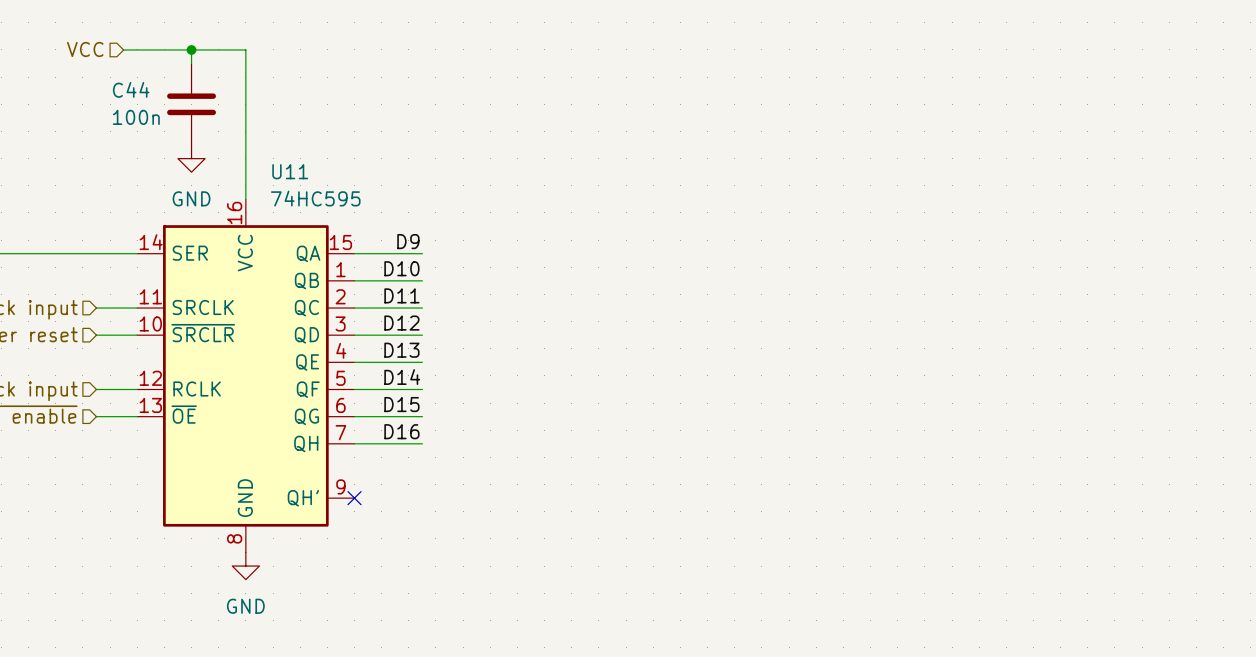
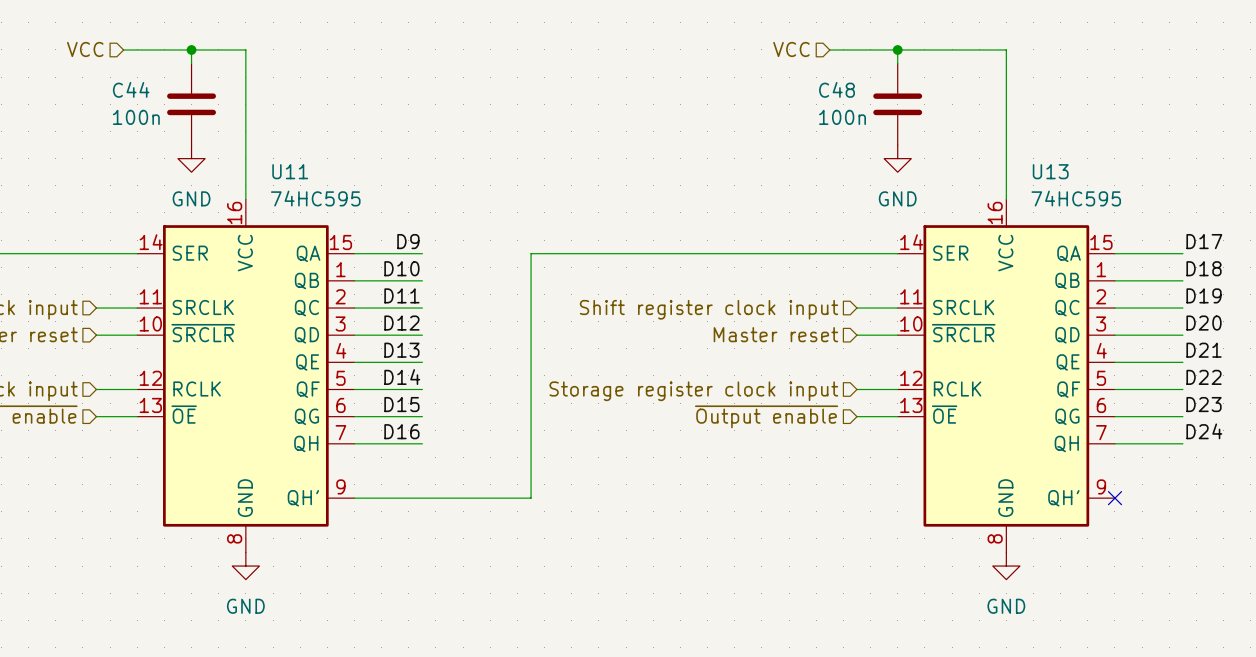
hierarchical label: none -> VCC (791, 49)
wire: none -> (829, 49) (1006, 49) (1006, 199)
wire: none -> (897, 49) (897, 63)
junction: none -> (897, 49)
C48: none -> 100n (897, 104)
power symbol: none -> GND (897, 158)
label: none -> D17 (1204, 241)
wire: none -> (897, 253) (531, 253) (531, 498) (354, 498)
wire: none -> (1114, 253) (1182, 253)
label: none -> D18 (1204, 268)
wire: none -> (1114, 280) (1182, 280)
label: none -> D19 (1204, 295)
wire: none -> (856, 308) (897, 308)
wire: none -> (1114, 308) (1182, 308)
hierarchical label: none -> Shift register clock input (708, 309)
label: none -> D20 (1204, 323)
hierarchical label: none -> Master reset (775, 334)
wire: none -> (856, 335) (897, 335)
wire: none -> (1114, 335) (1182, 335)
label: none -> D21 (1204, 350)
wire: none -> (1114, 362) (1182, 362)
U13: none -> 74HC595 (1006, 375)
label: none -> D22 (1204, 377)
wire: none -> (856, 389) (897, 389)
wire: none -> (1114, 389) (1182, 389)
hierarchical label: none -> Storage register clock input (693, 391)
label: none -> D23 (1204, 404)
hierarchical label: none -> ~{Output enable} (766, 416)
wire: none -> (856, 416) (897, 416)
wire: none -> (1114, 416) (1182, 416)
label: none -> D24 (1204, 431)
wire: none -> (1114, 443) (1182, 443)
no-connect mark: (354, 498) -> none
no-connect mark: none -> (1114, 498)
power symbol: none -> GND (1006, 566)

